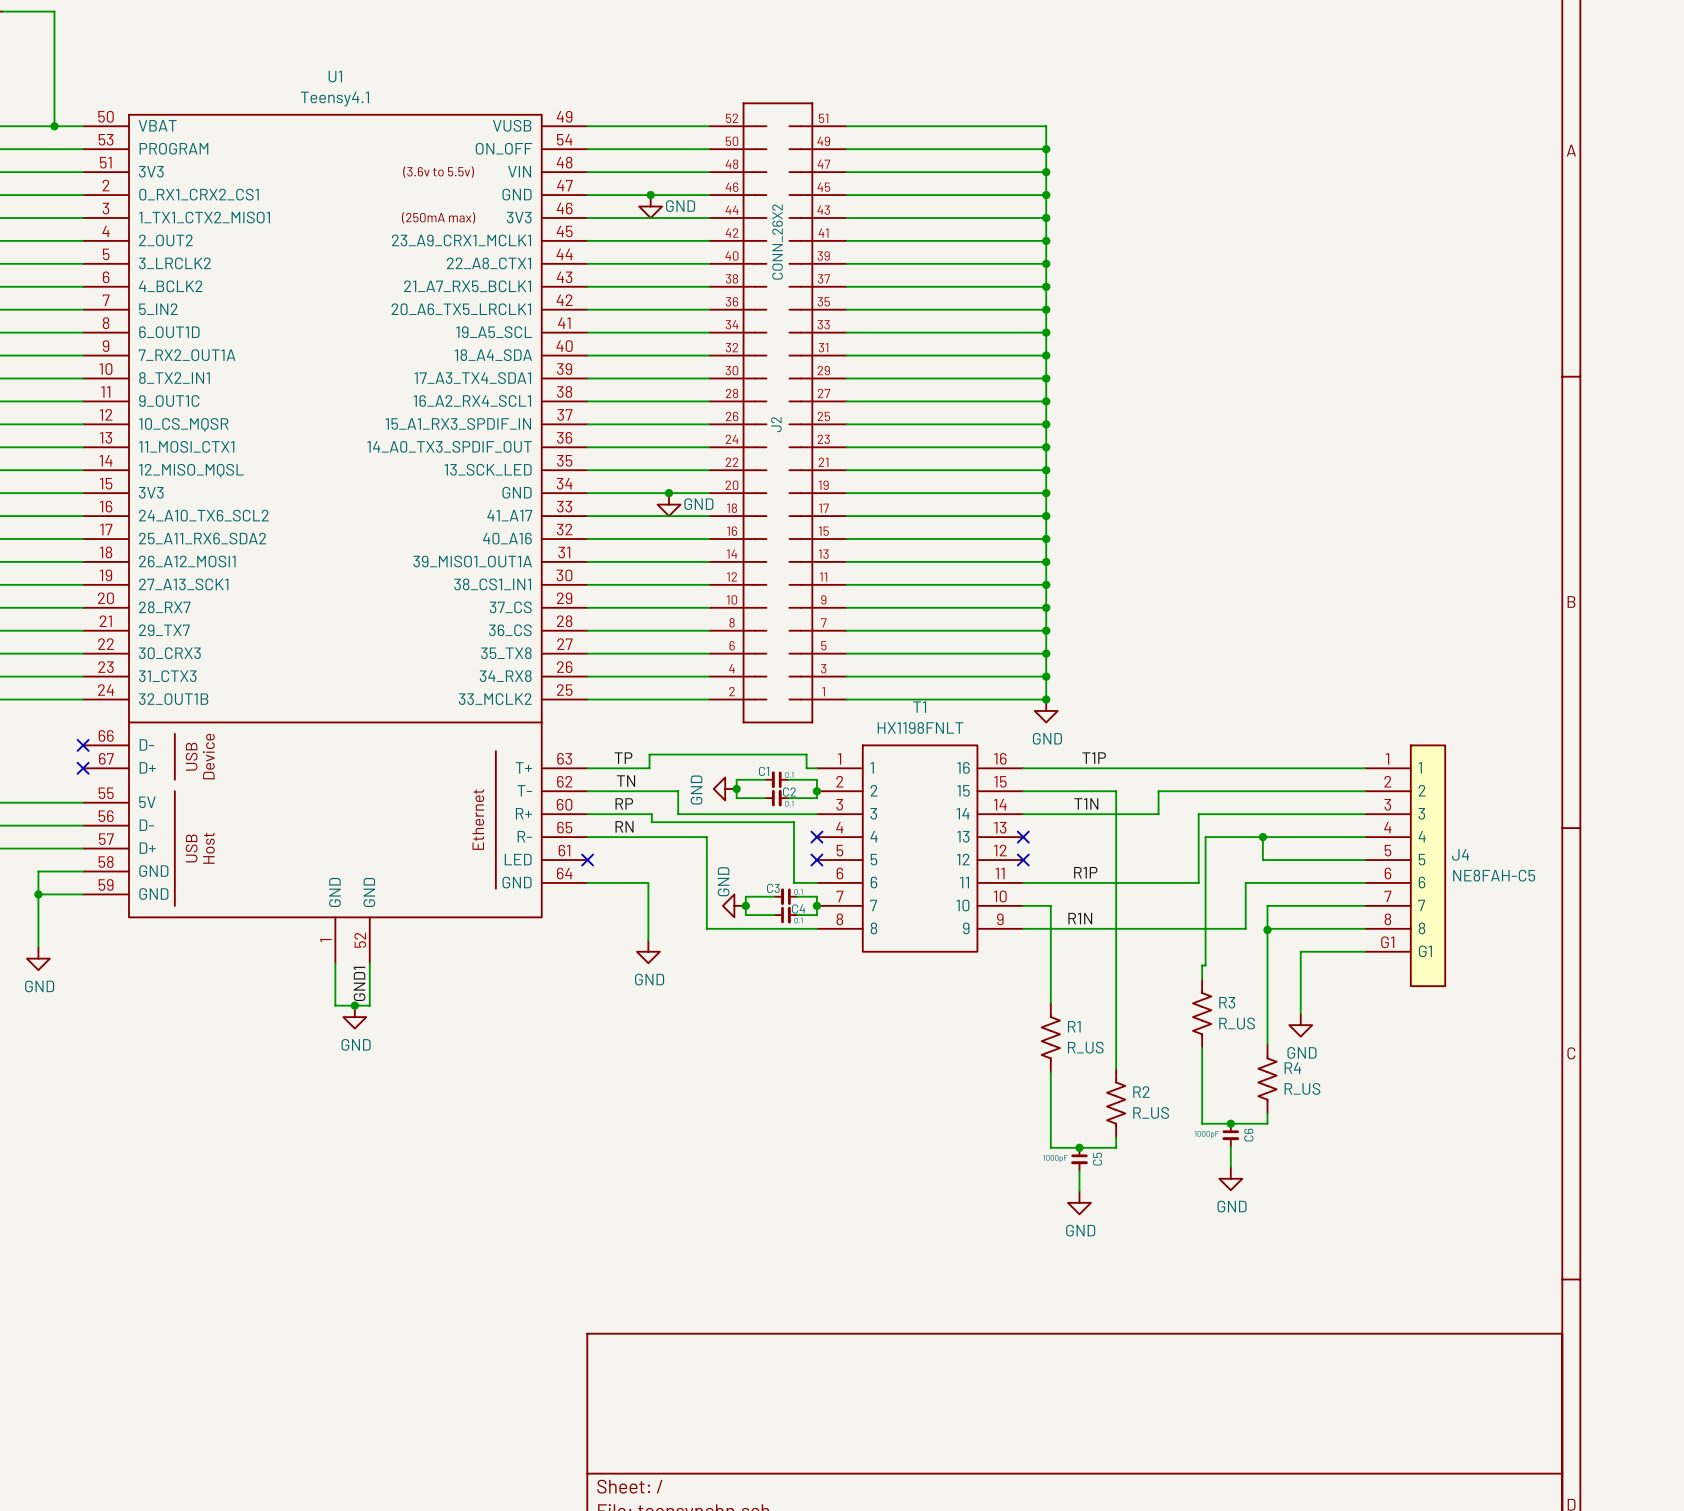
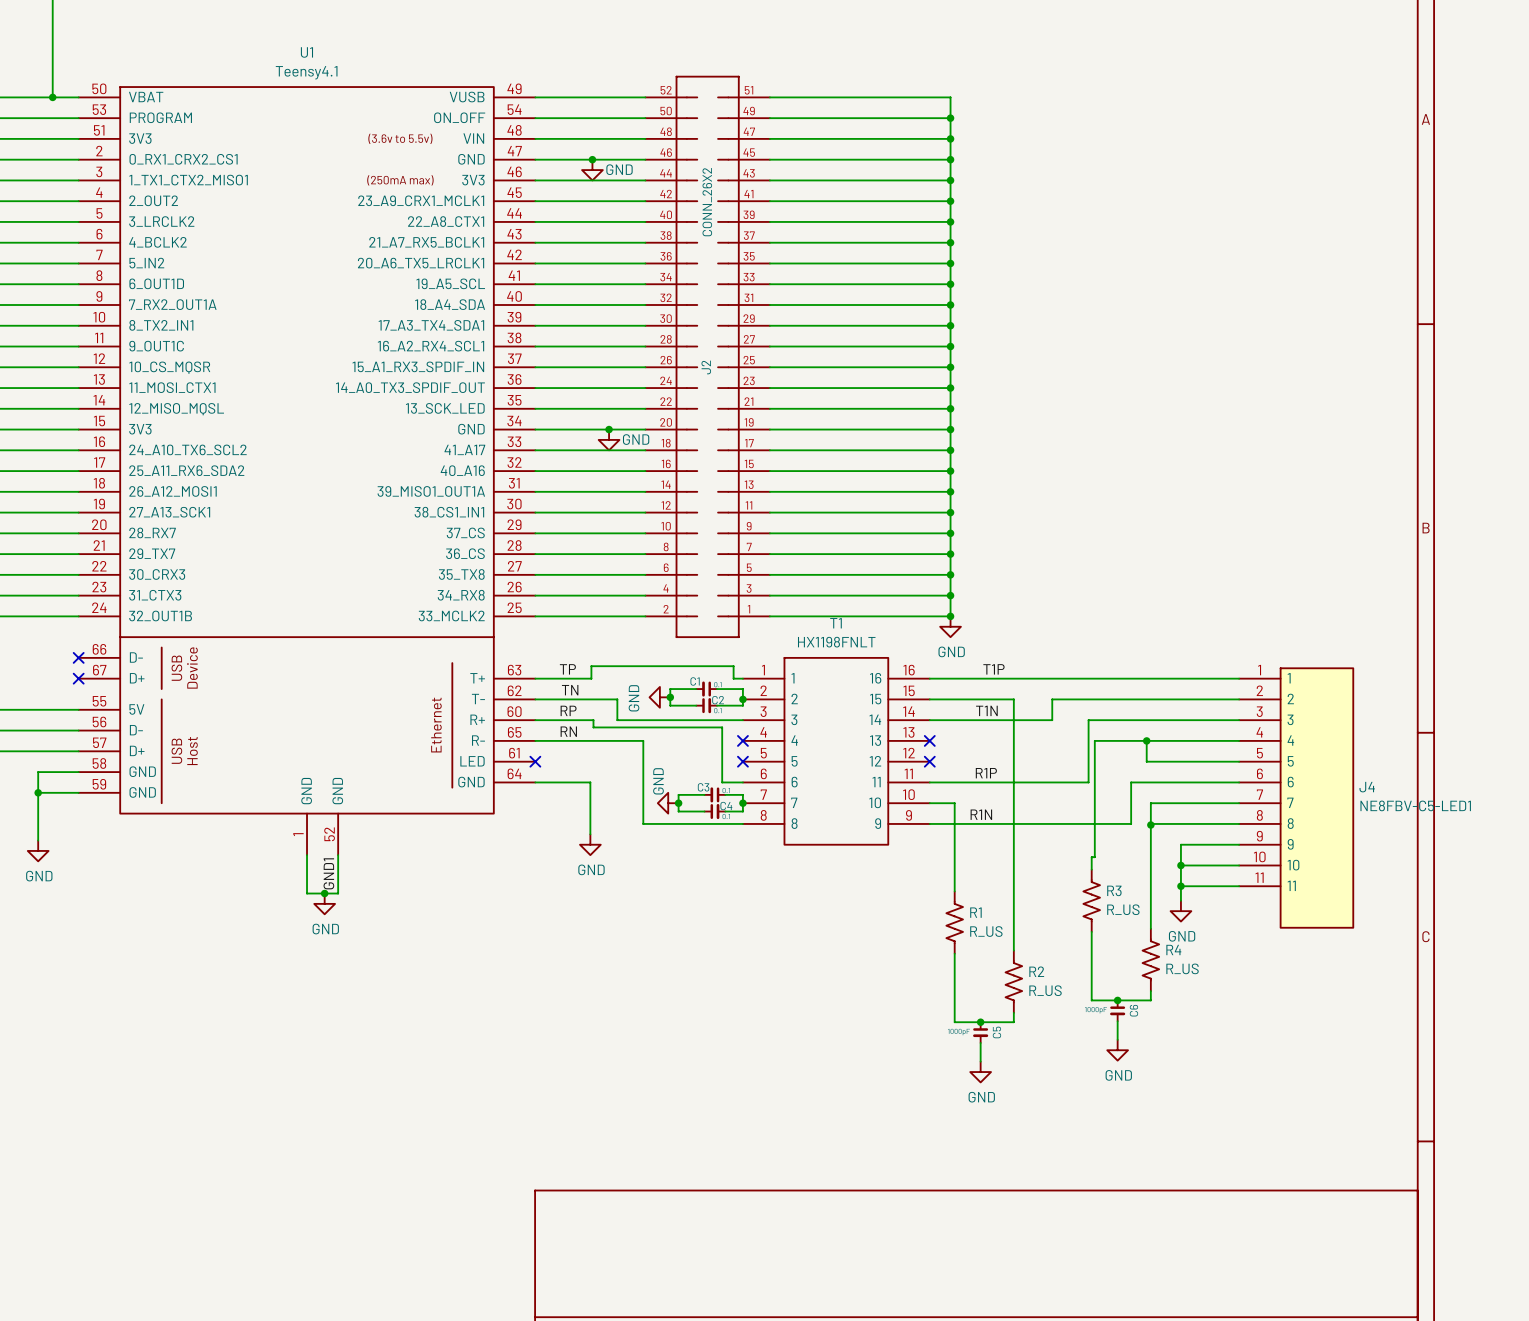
J4 symbol: [1364, 745, 1446, 987] -> [1239, 668, 1354, 928]
J4 name position: J4 (1460, 854) -> J4 (1367, 787)
J4 value: NE8FAH-C5 (1494, 875) -> NE8FBV-C5-LED1 (1415, 805)
wire: none -> (1180, 865) (1239, 865)
junction: none -> (1180, 865)
wire: none -> (1180, 886) (1239, 886)
junction: none -> (1180, 886)

